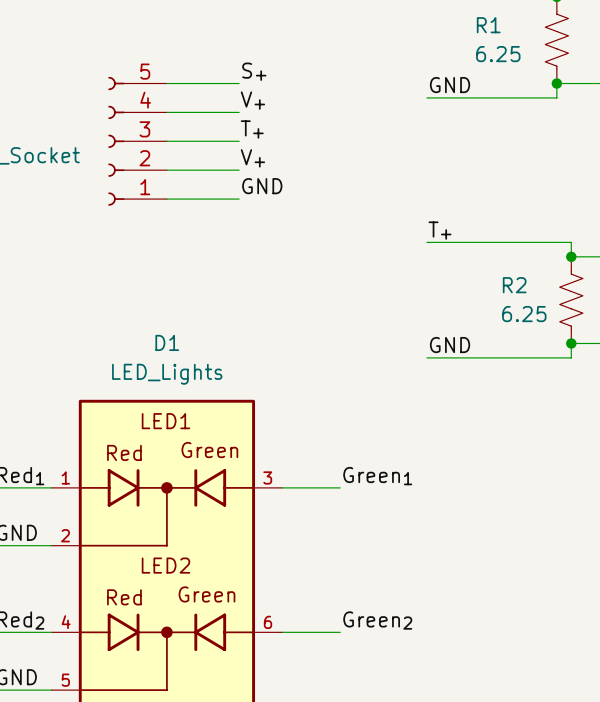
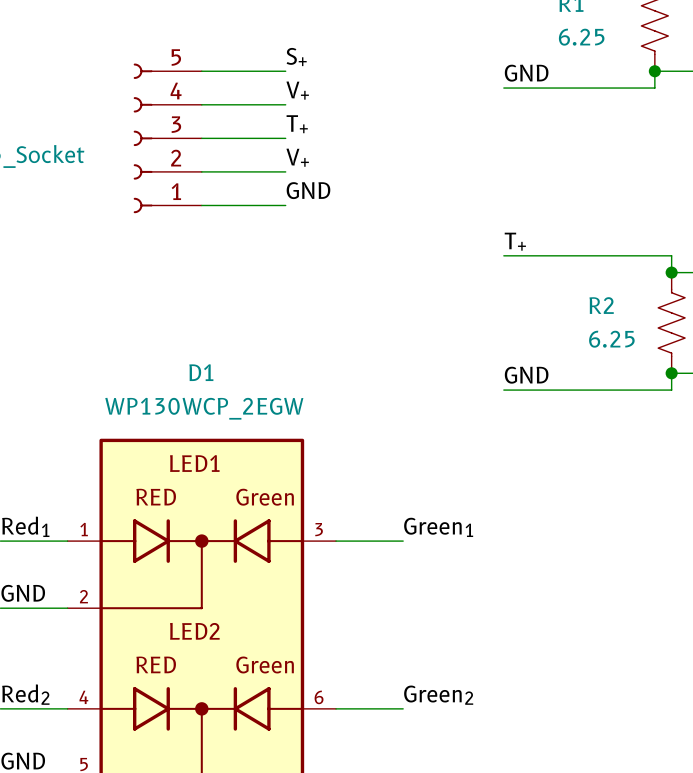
D1 value: LED_Lights (167, 374) -> WP130WCP_2EGW (204, 408)
D1 text: none -> RED (156, 497)
D1 text position: Green (209, 450) -> Green (265, 664)
D1 text: Red (124, 452) -> none
D1 text: none -> RED (156, 664)
D1 text position: Green (206, 594) -> Green (265, 497)
D1 text: Red (124, 597) -> none

